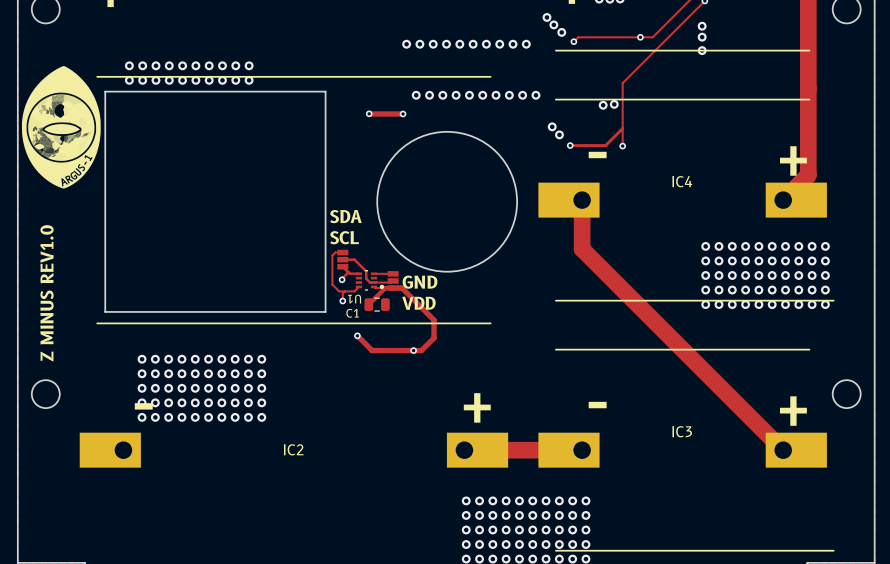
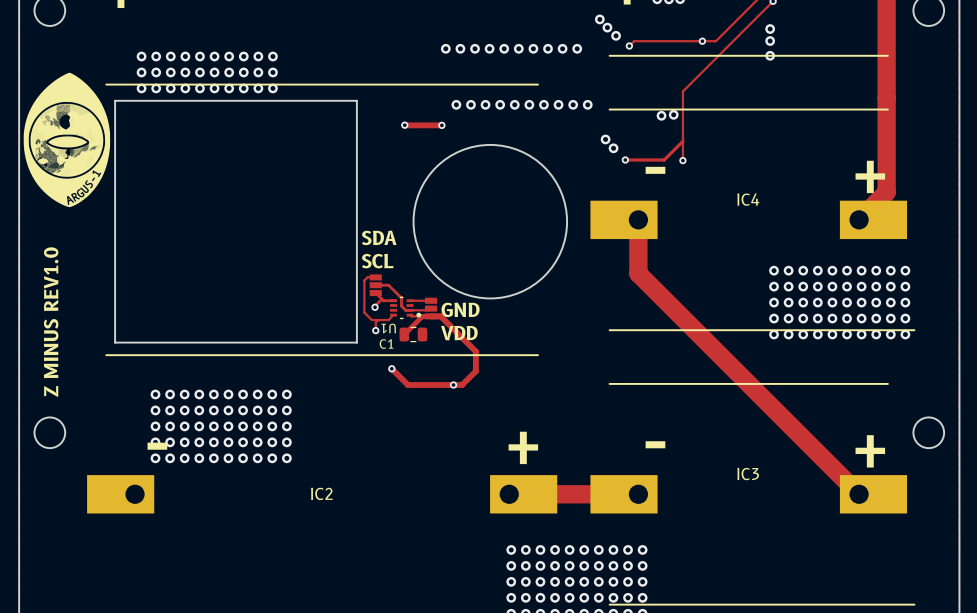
via: none -> (141, 56)
via: none -> (156, 56)
via: none -> (170, 56)
via: none -> (185, 56)
via: none -> (199, 56)
via: none -> (214, 56)
via: none -> (229, 56)
via: none -> (243, 56)
via: none -> (258, 56)
via: none -> (272, 56)

